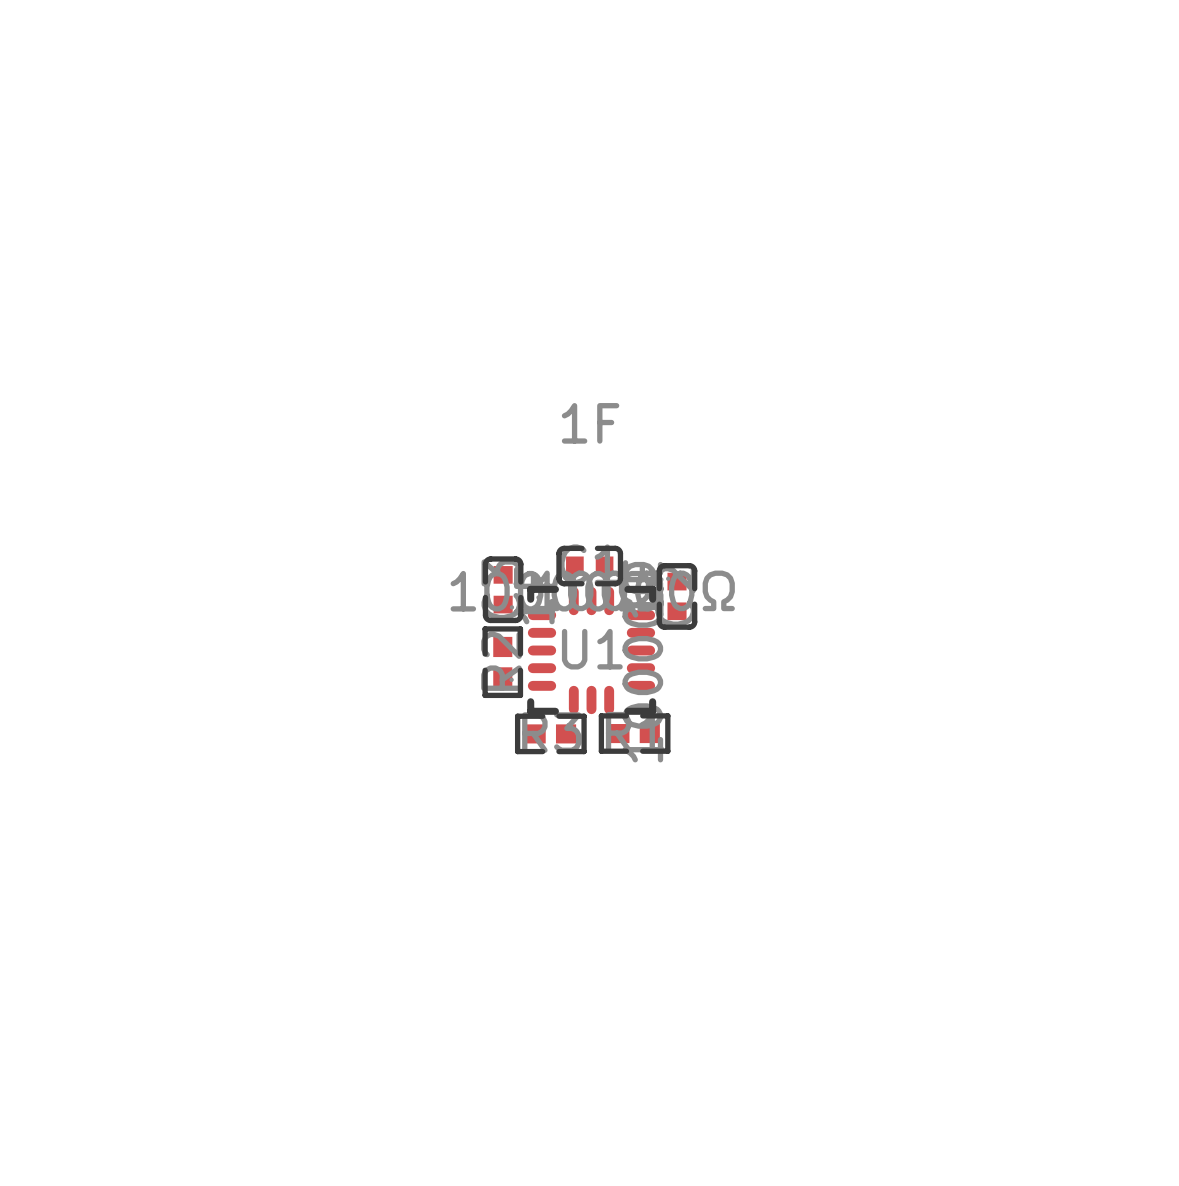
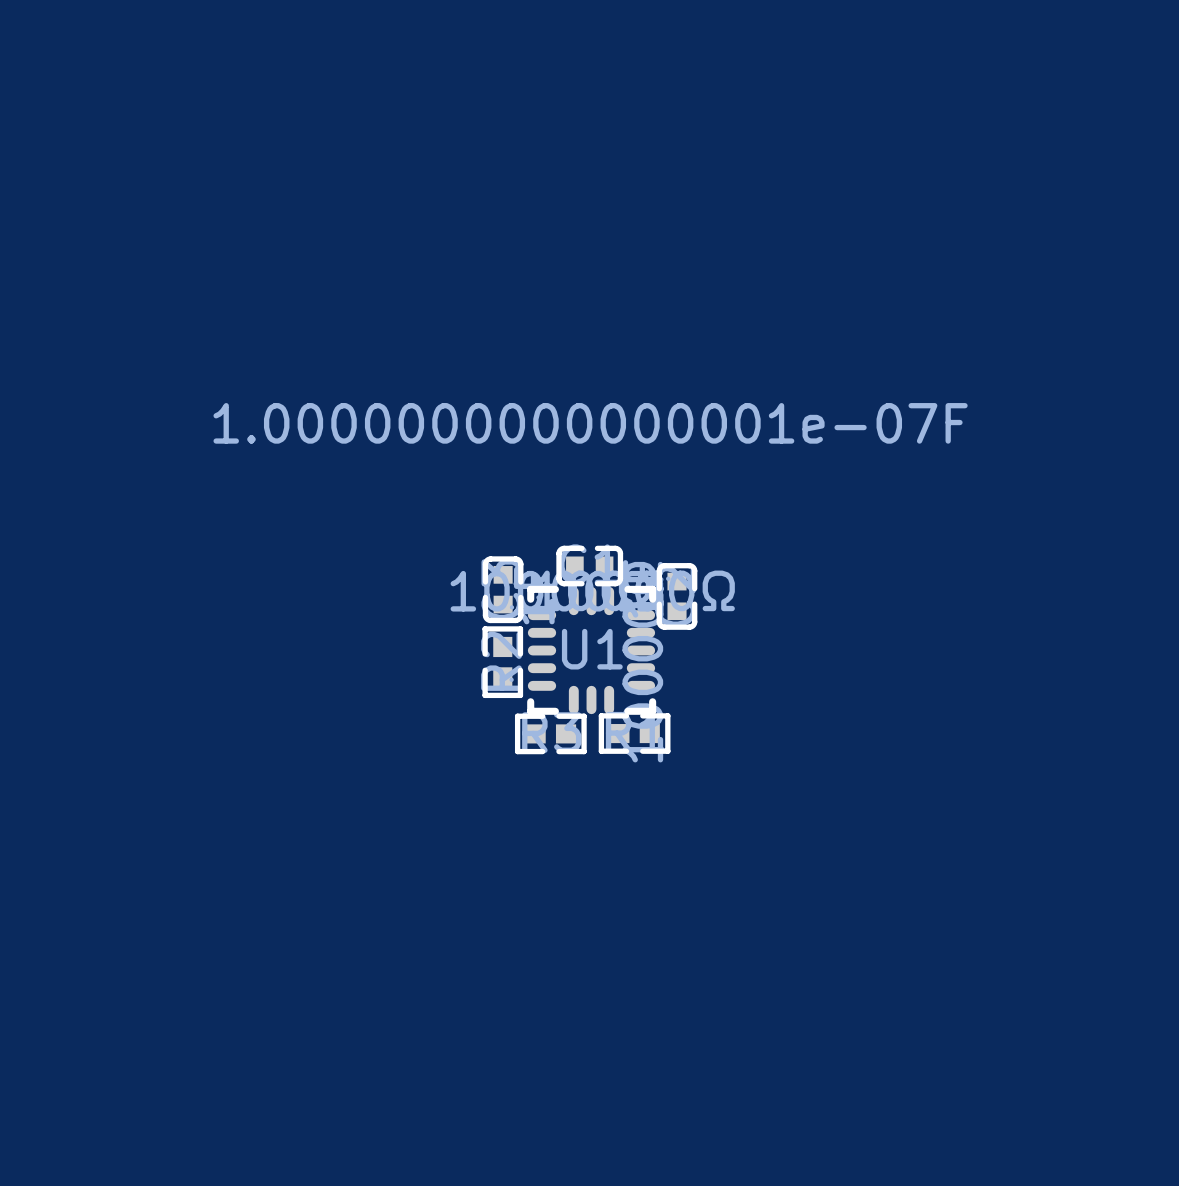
part value: 1F (590, 423) -> 1.0000000000000001e-07F (590, 423)

